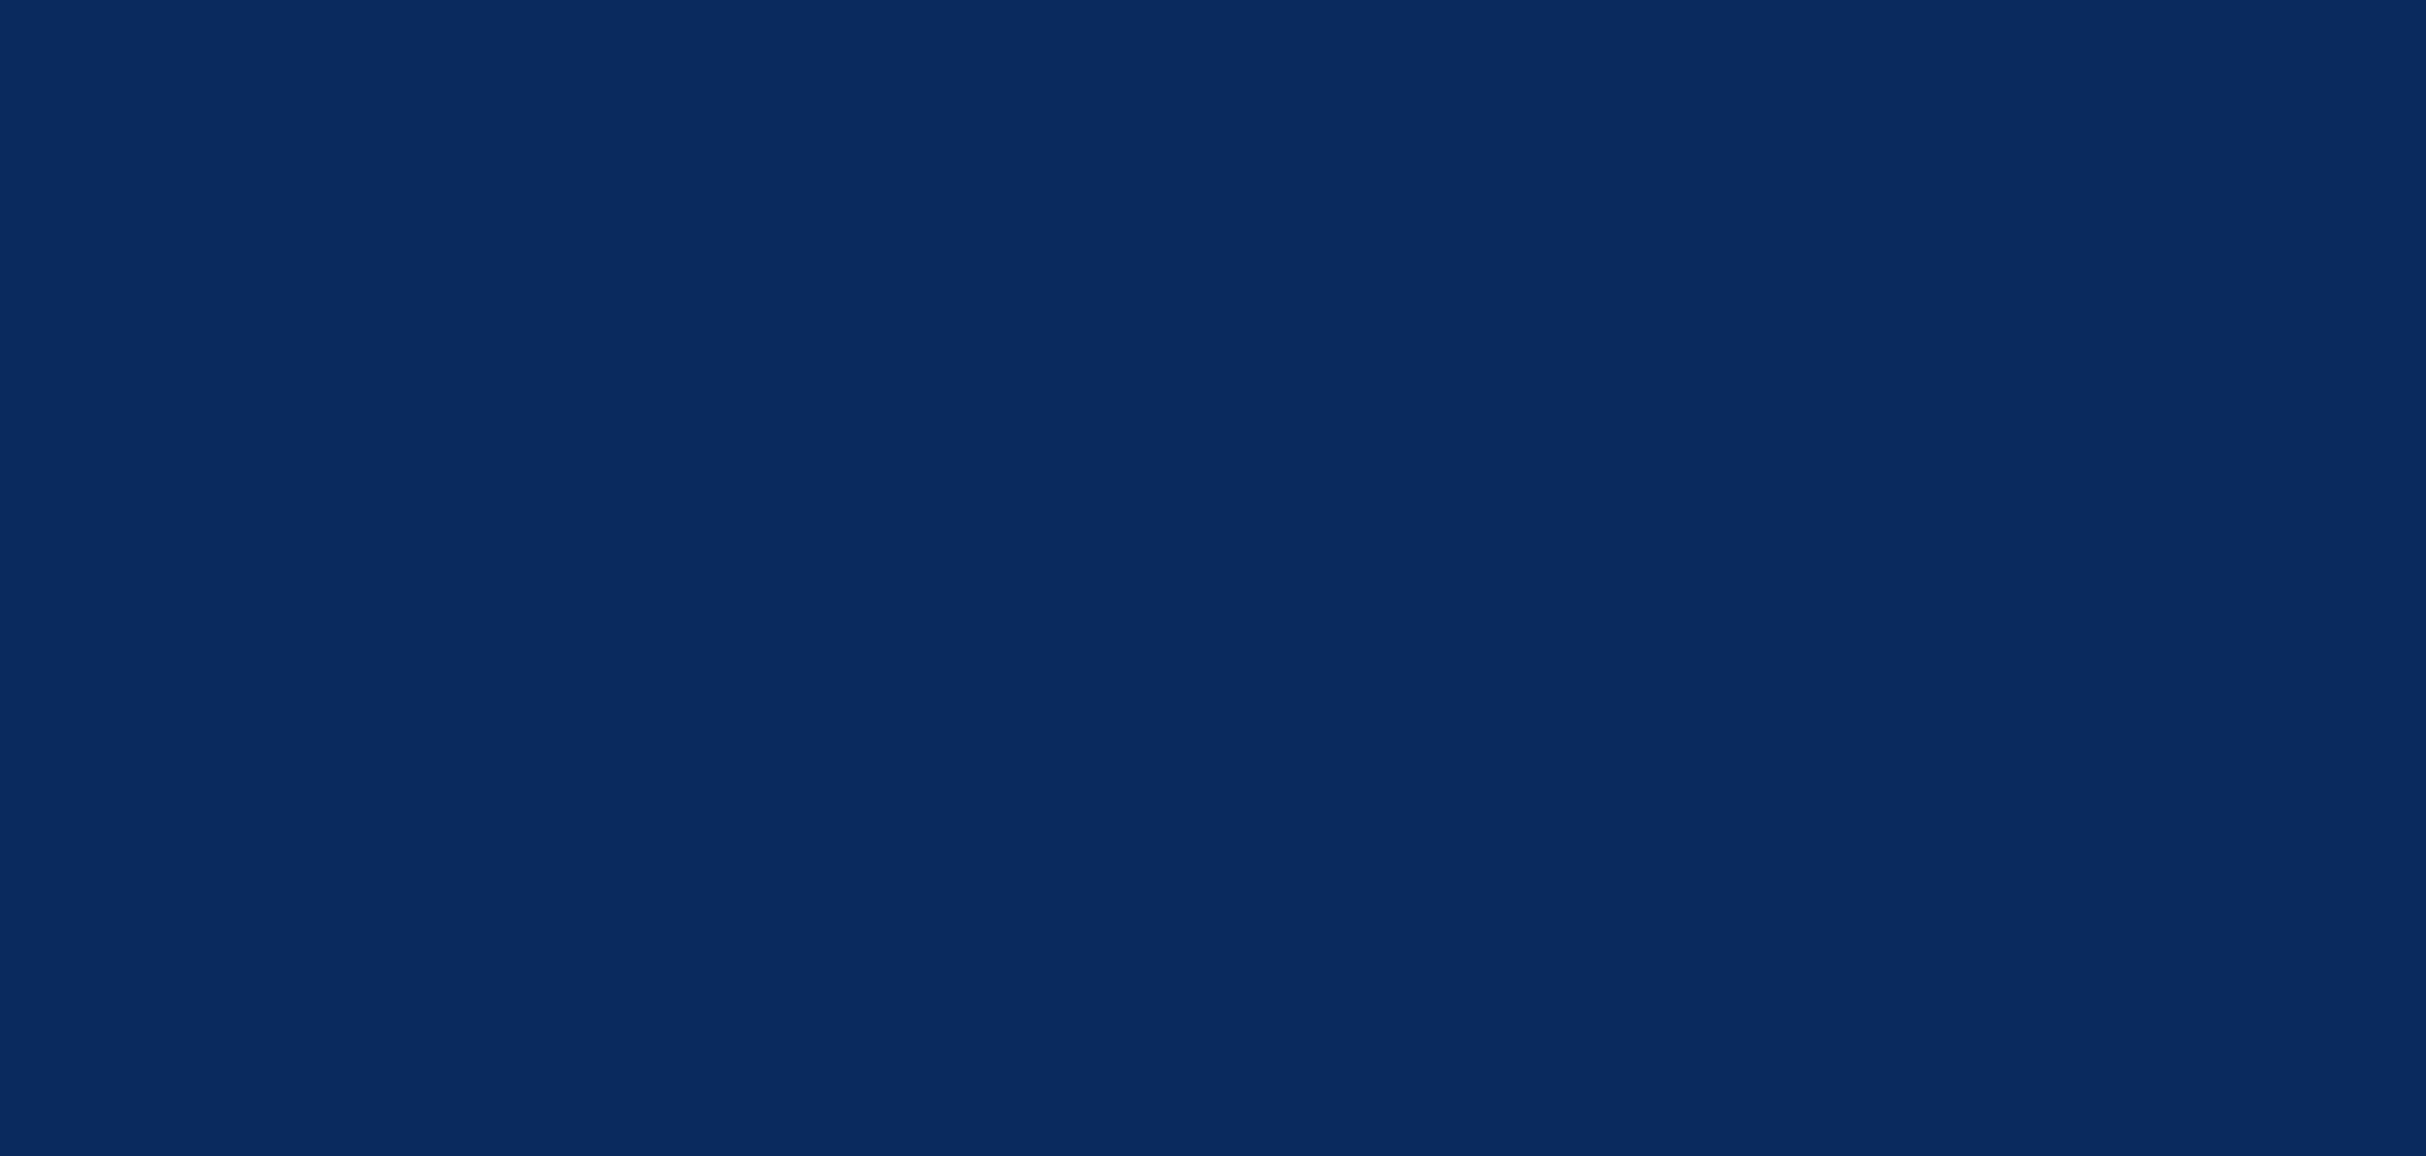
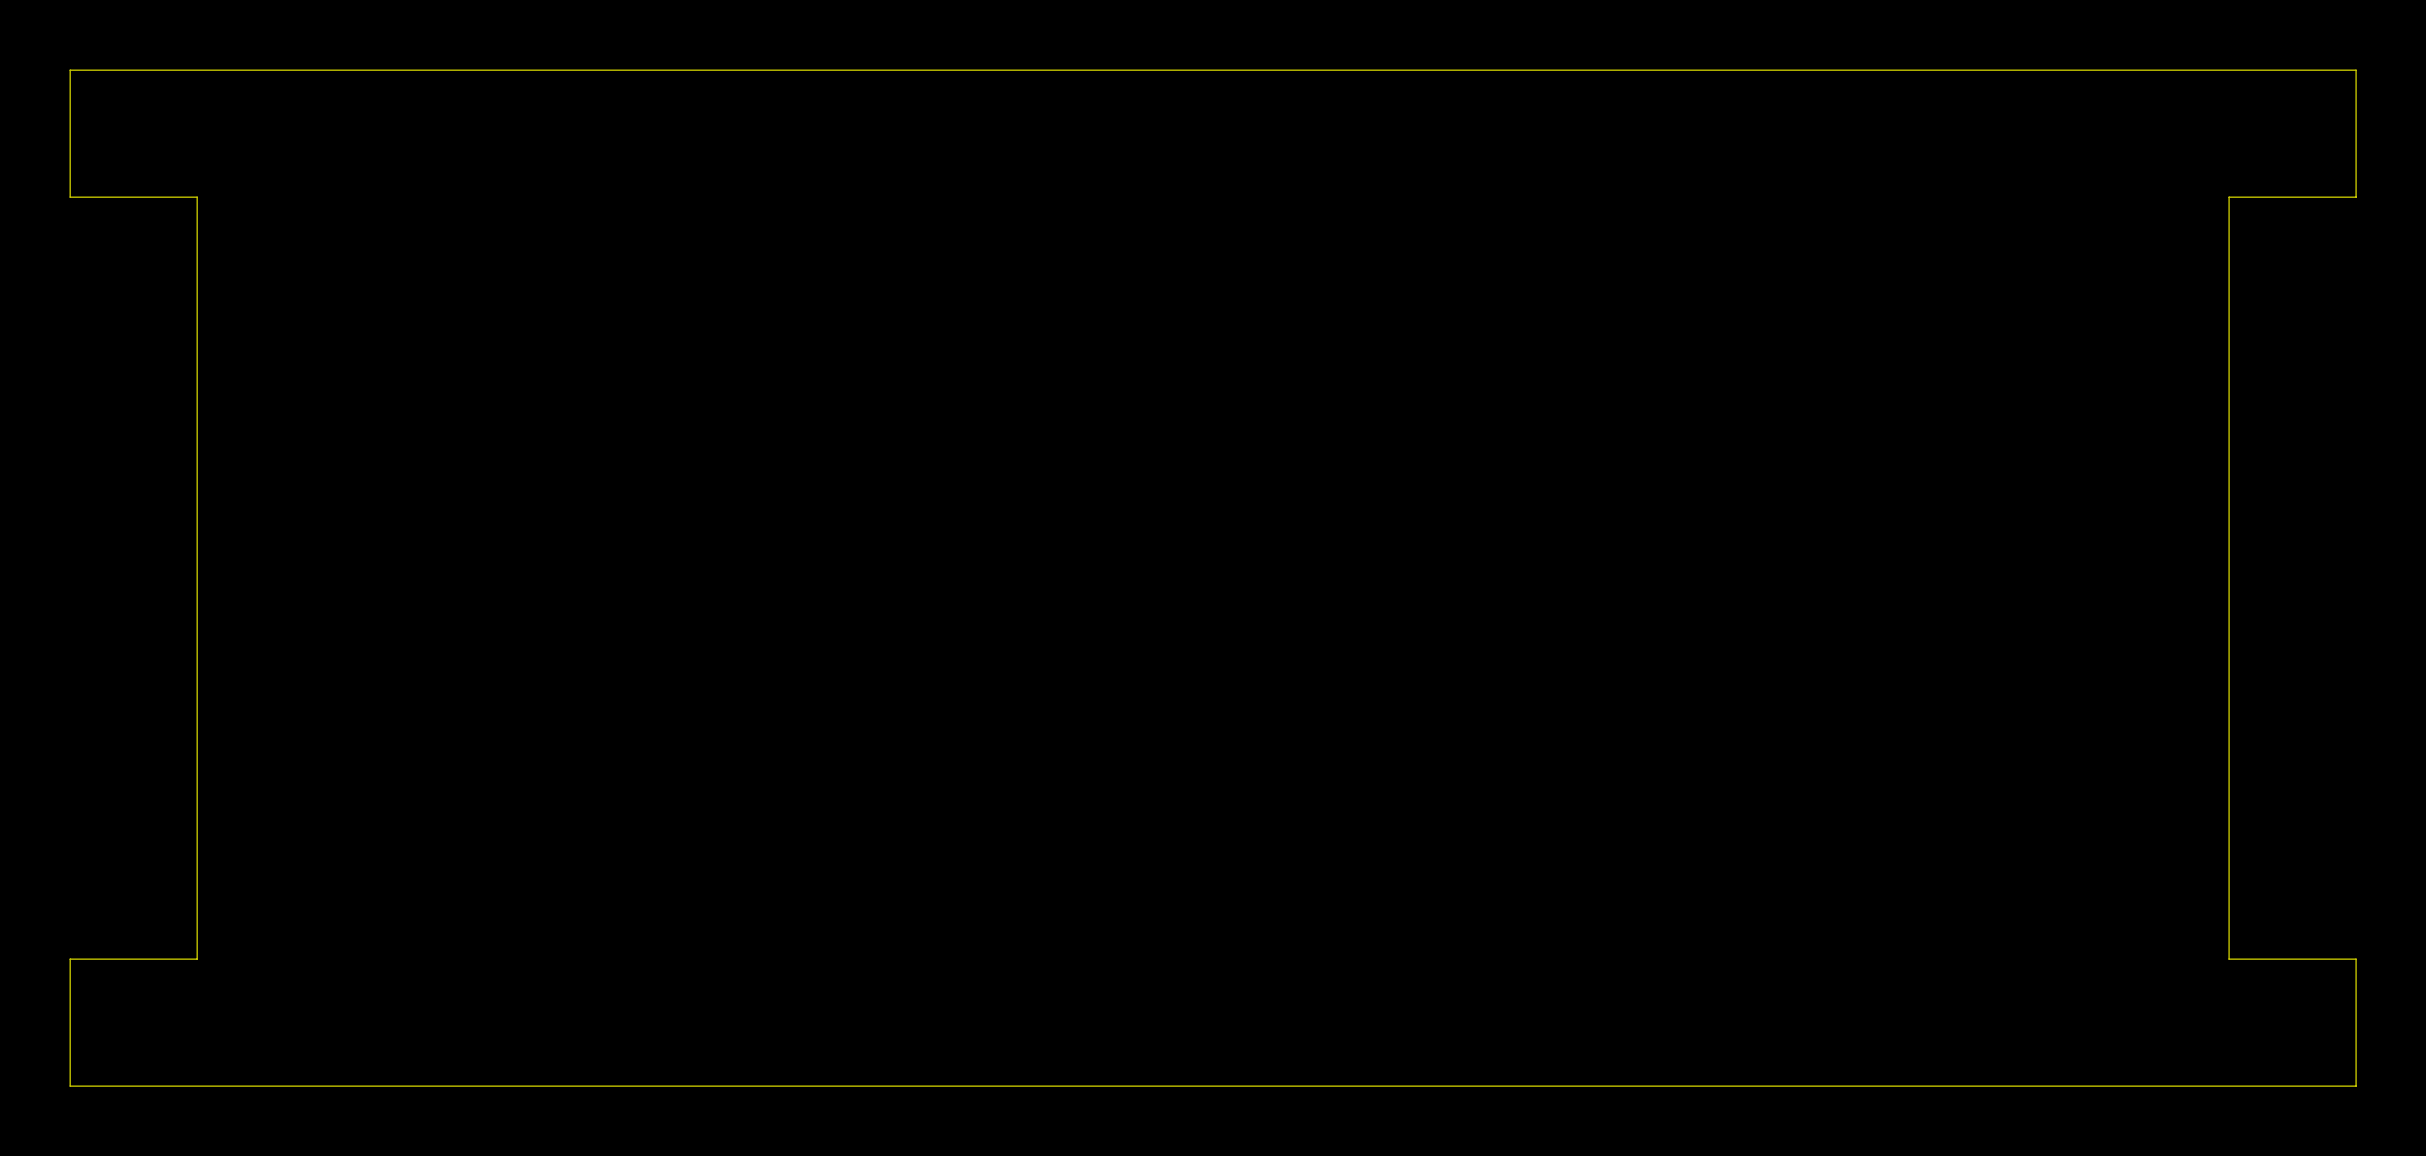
board edge: none -> (70, 70) (70, 197) (197, 197) (197, 959) (70, 959) (70, 1086) (2356, 1086) (2356, 959) (2229, 959) (2229, 197) (2356, 197) (2356, 70) (70, 70)

